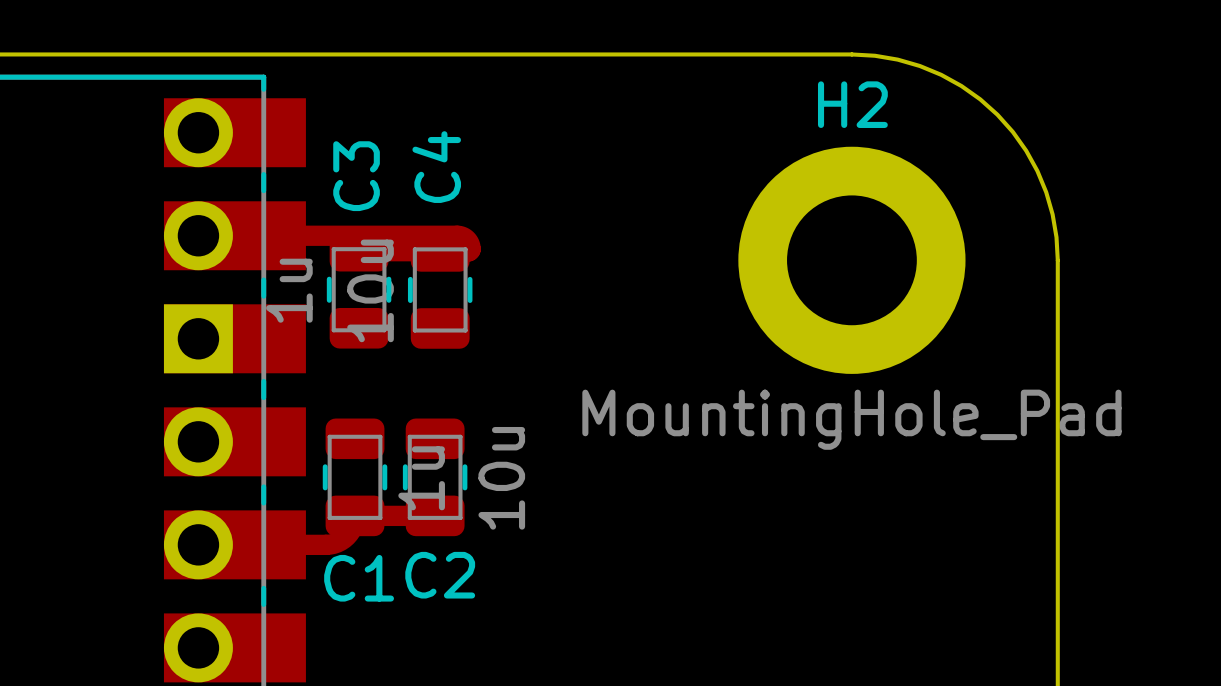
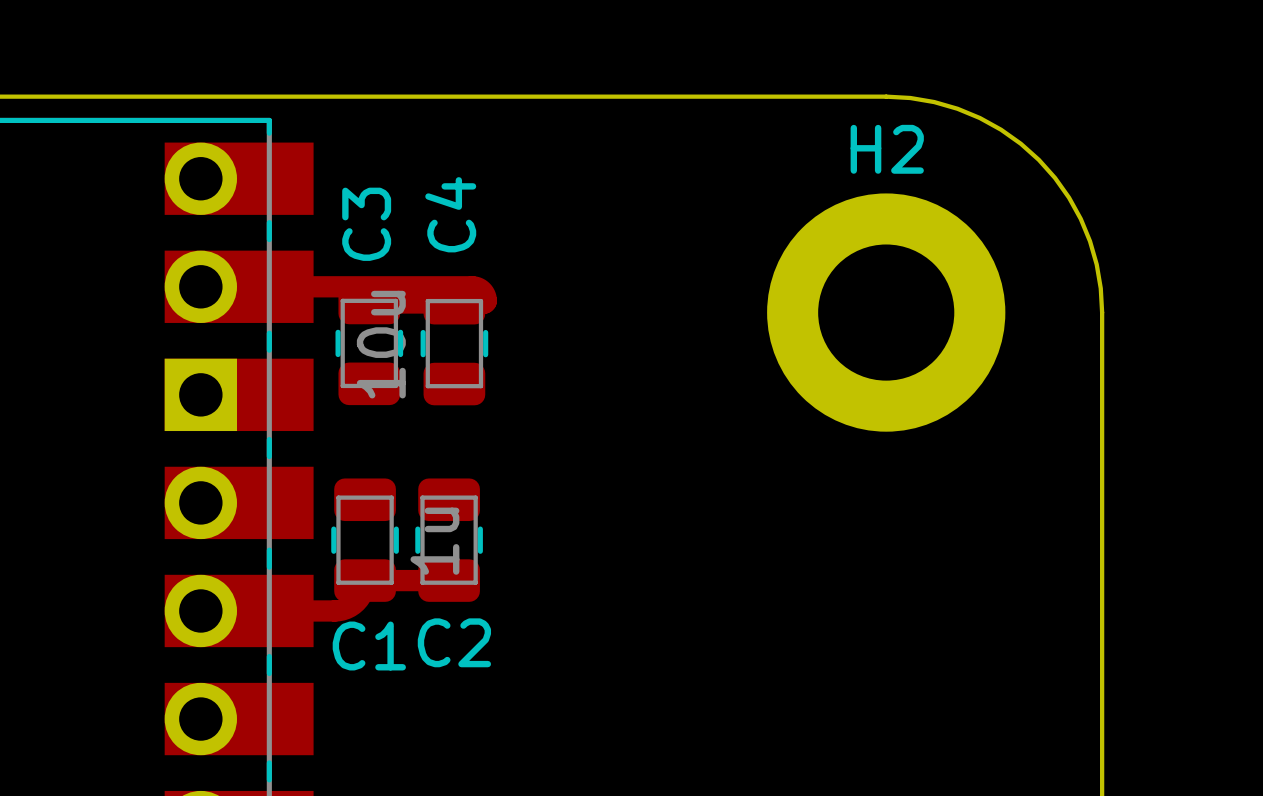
C3 value: 1u (289, 290) -> none
H2 value: MountingHole_Pad (851, 419) -> none
C2 value: 10u (501, 478) -> none

